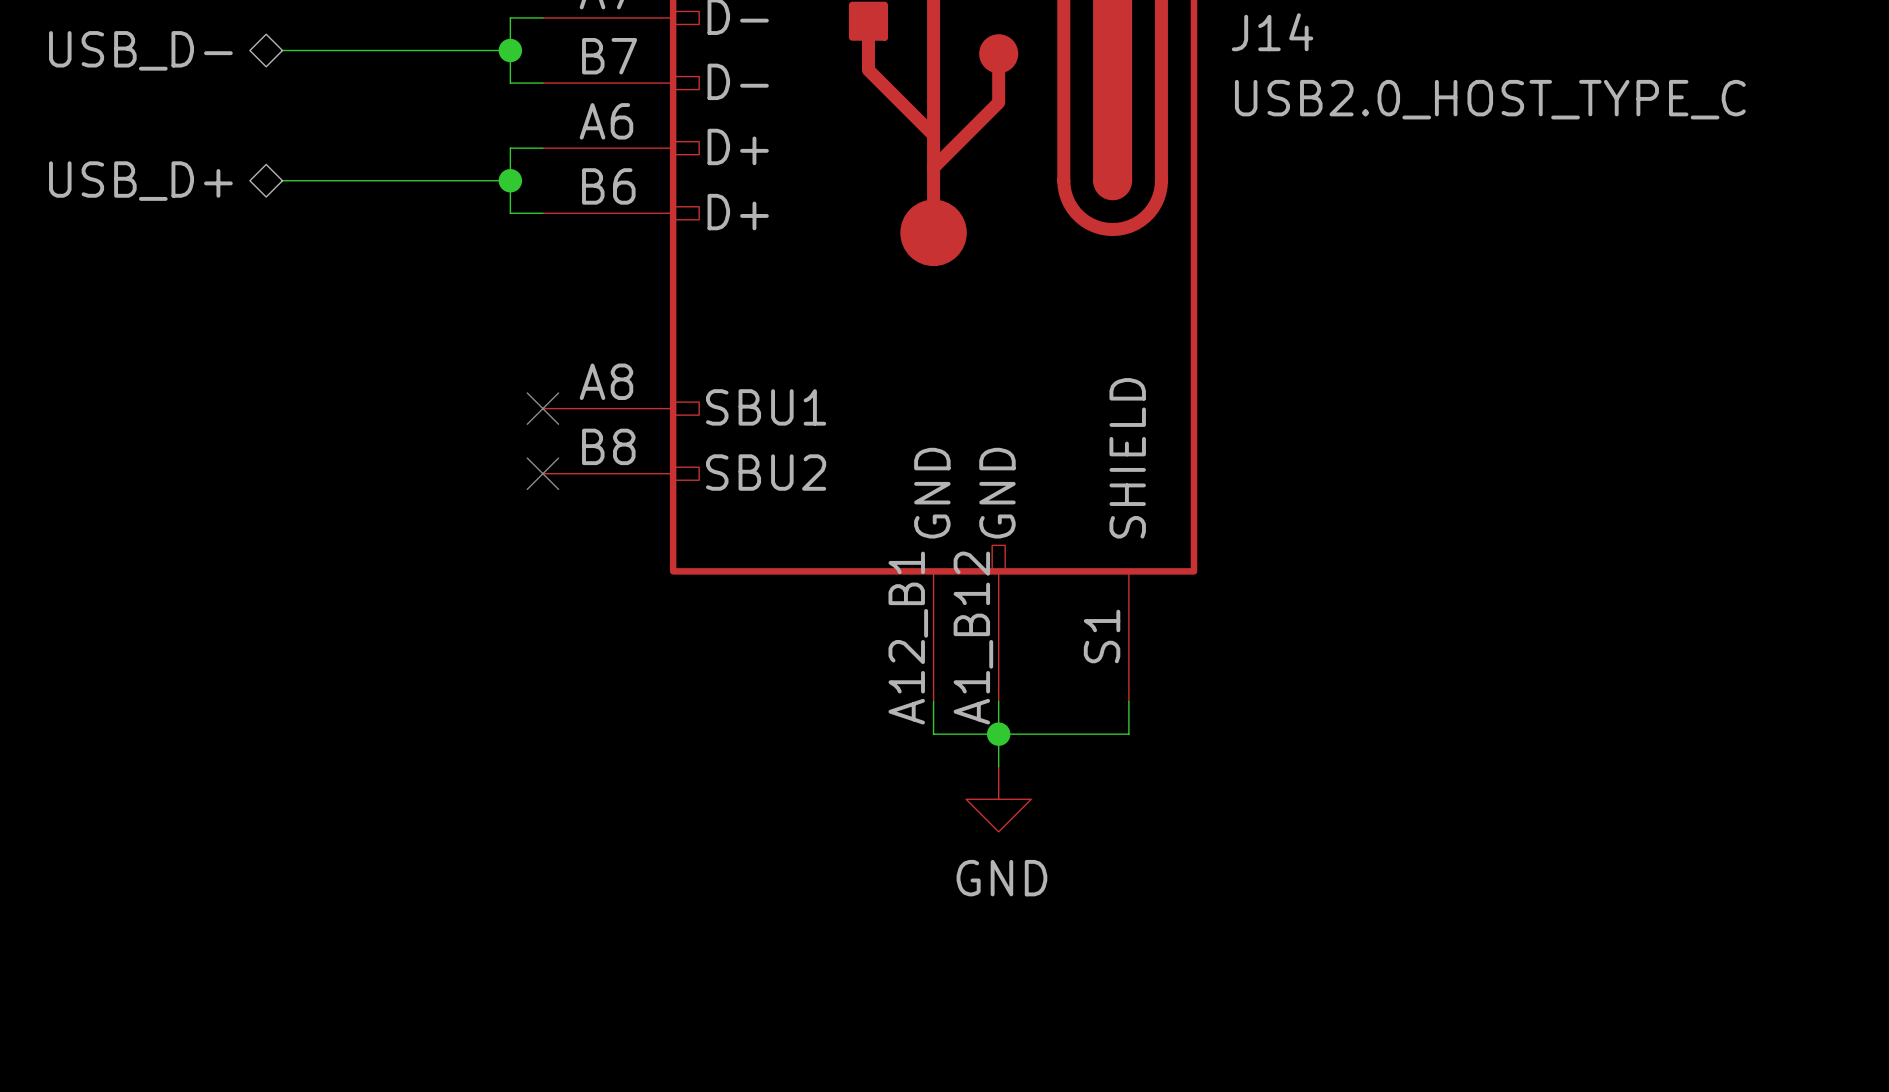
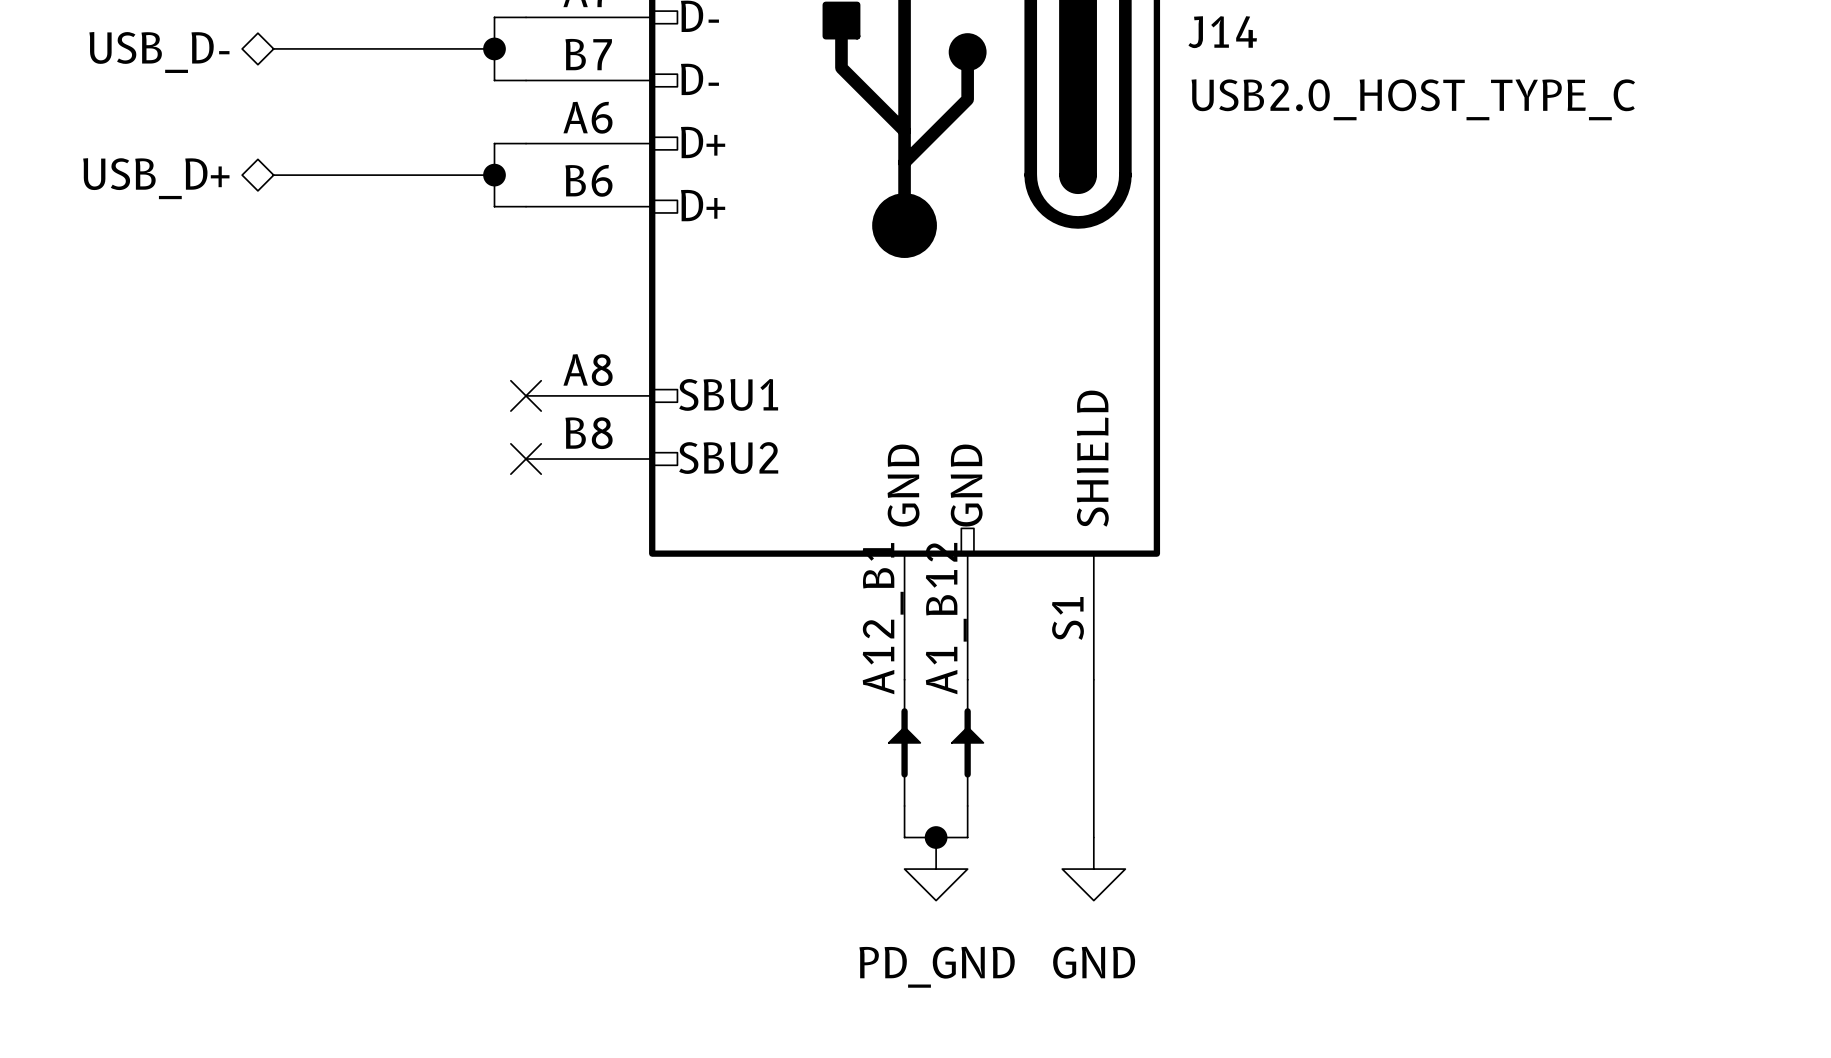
wire: (933, 701) (933, 734) (1128, 734) -> (1093, 837) (1093, 711)
junction position: (998, 734) -> (936, 837)
part: none -> (904, 742)
part: none -> (967, 742)
power symbol position: GND (998, 799) -> GND (1093, 869)
wire: none -> (904, 805) (904, 837) (967, 837) (967, 805)
power symbol text position: GND (1001, 878) -> GND (1094, 962)
power symbol: none -> PD_GND (936, 869)

